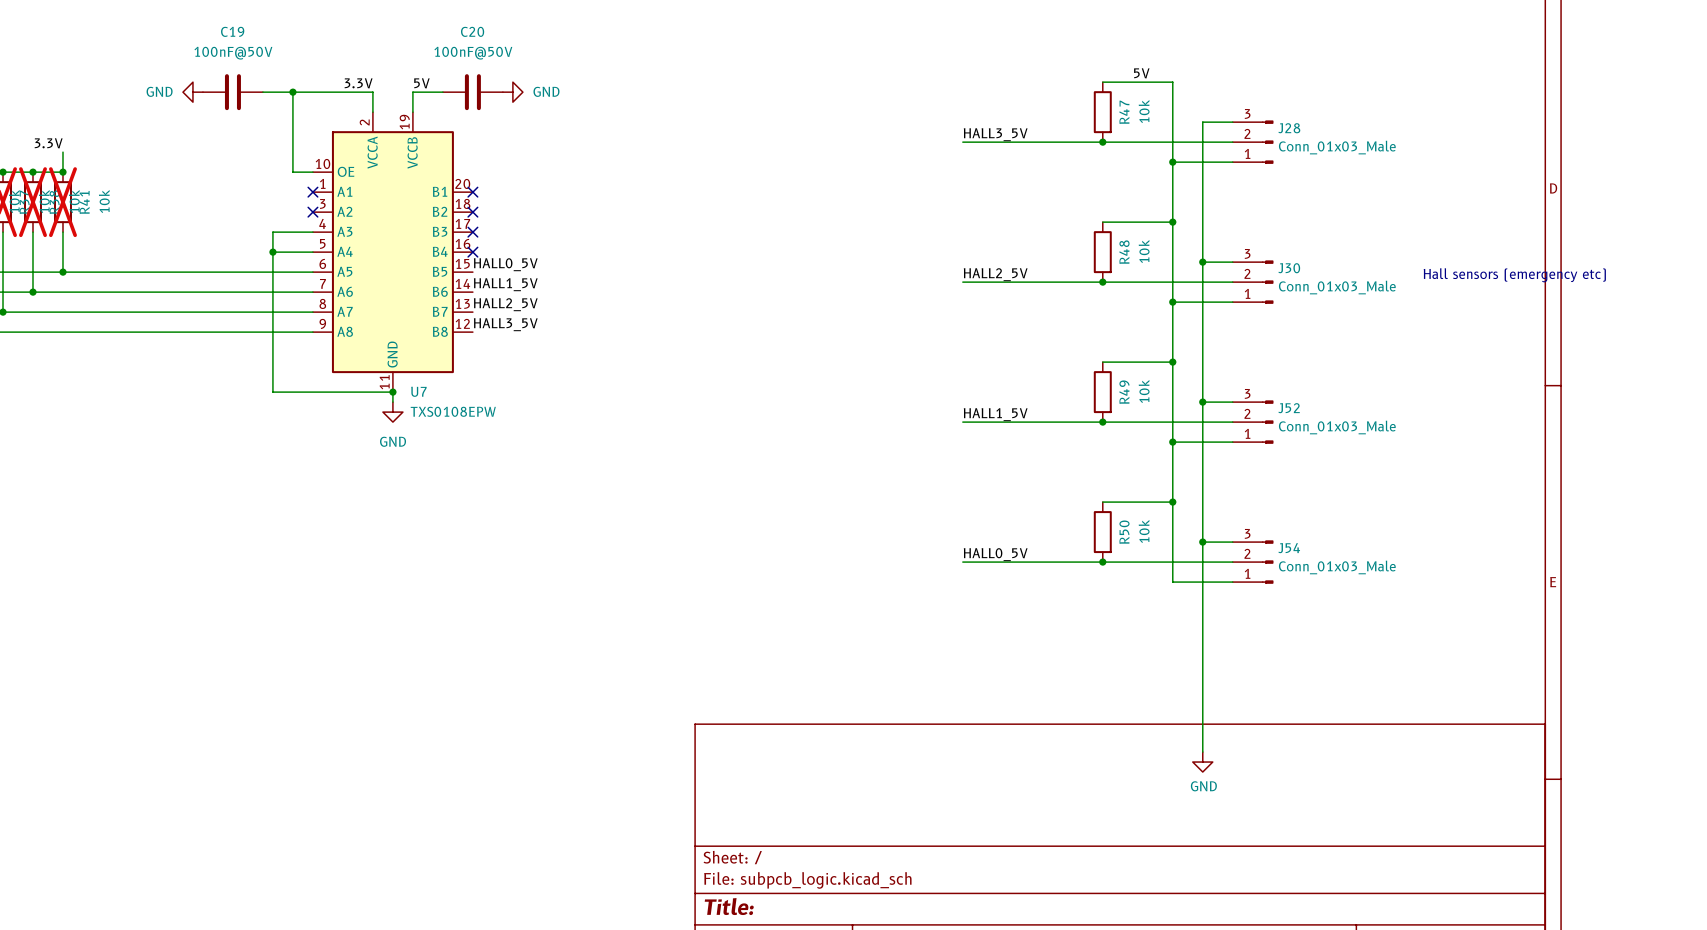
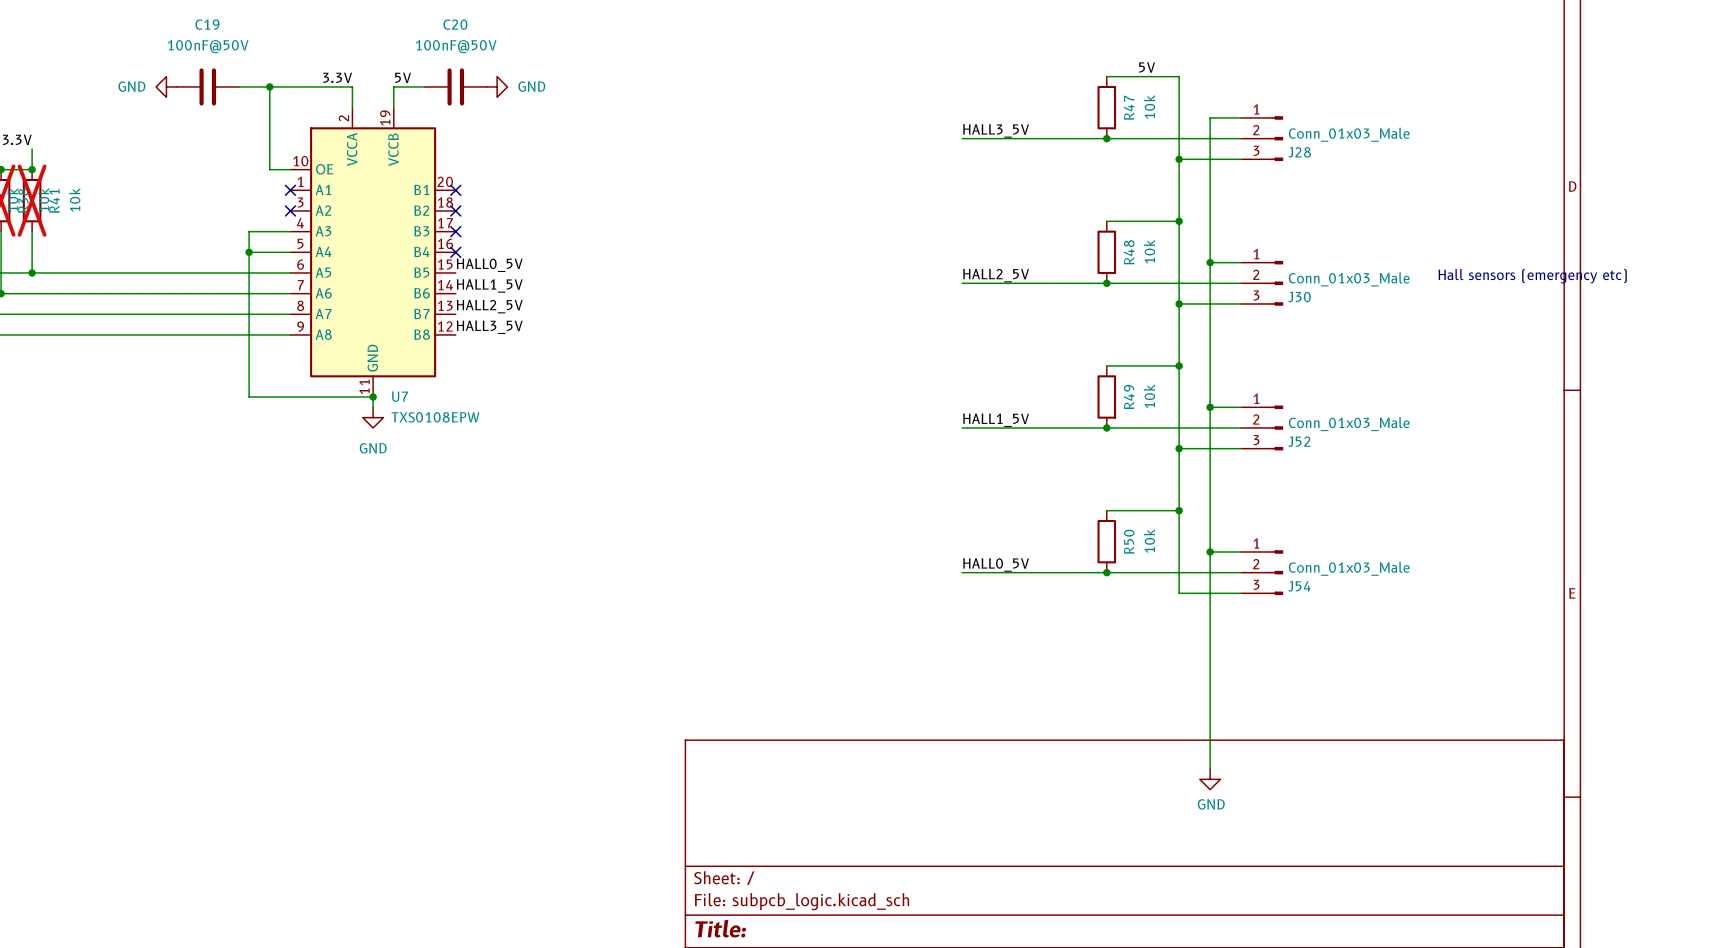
J28 flip: as is (1267, 142) -> up-down (1277, 138)
J30 flip: as is (1267, 282) -> up-down (1277, 283)
J52 flip: as is (1267, 422) -> up-down (1277, 427)
J54 flip: as is (1267, 562) -> up-down (1277, 572)

